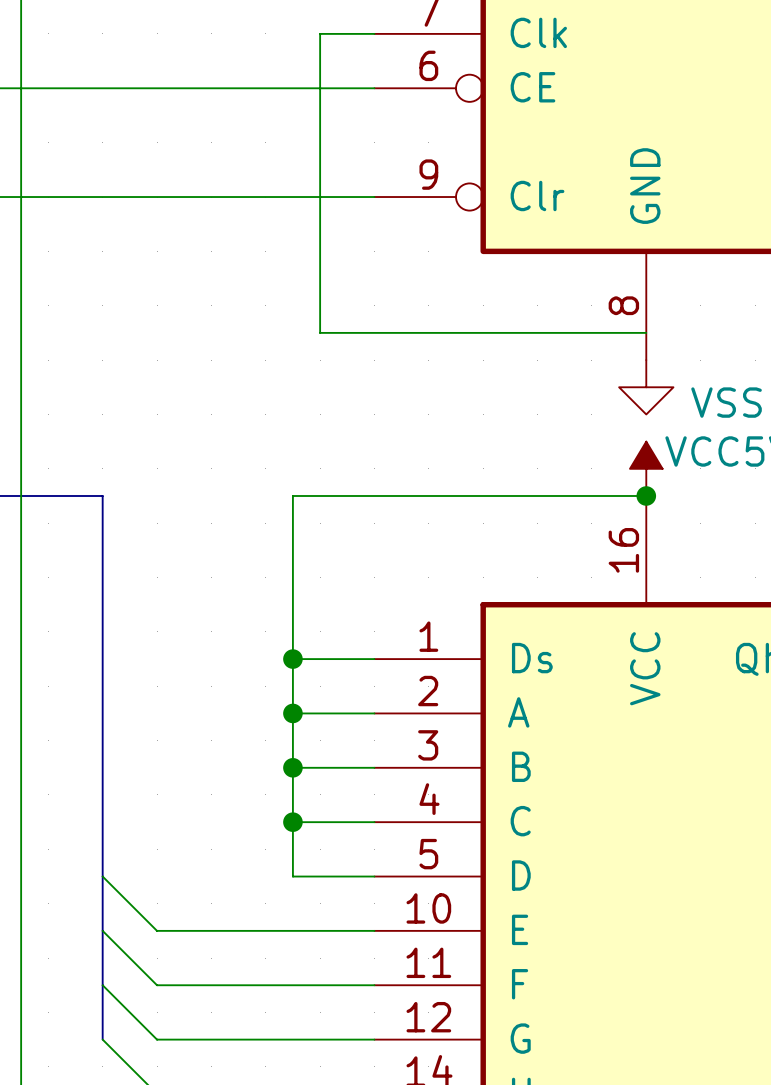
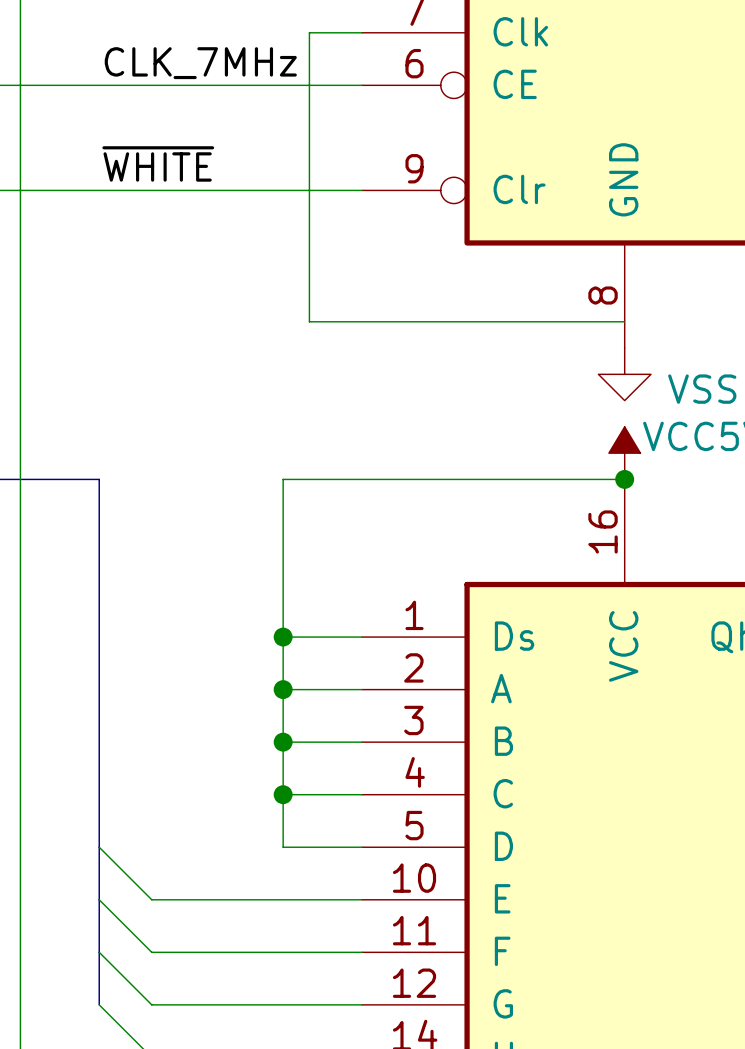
label: none -> CLK_7MHz (200, 63)
label: none -> ~{WHITE} (158, 163)

